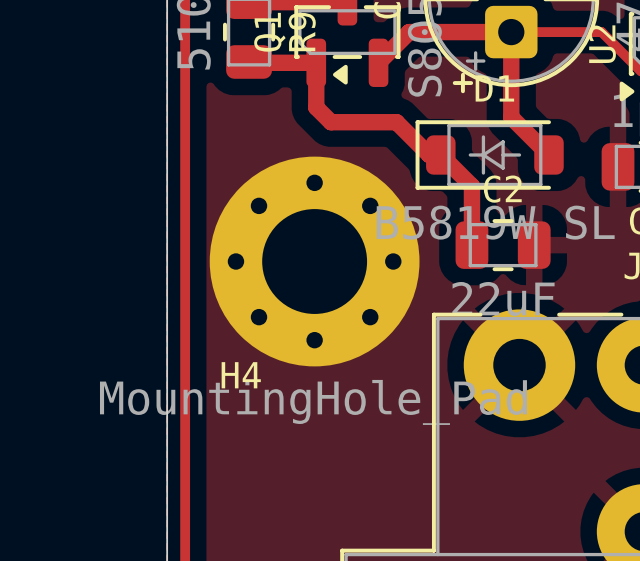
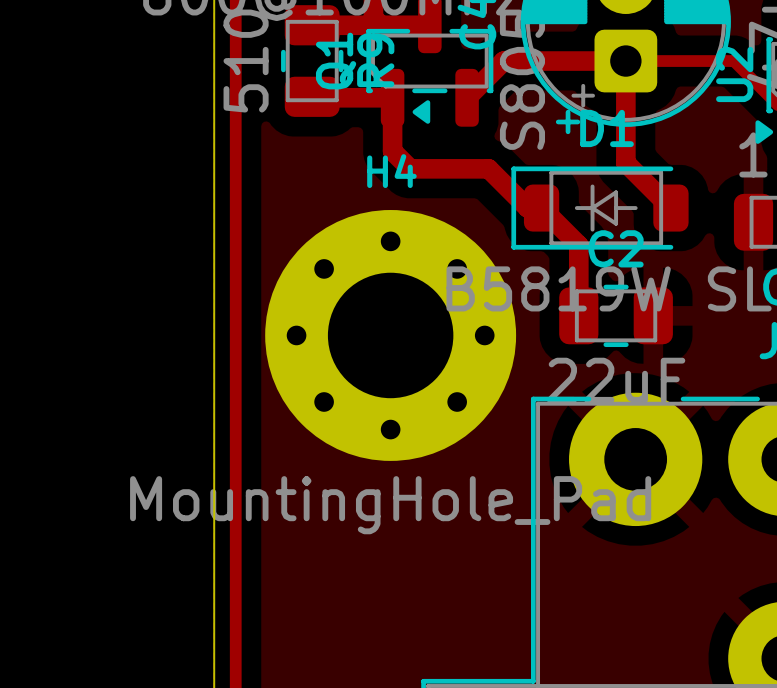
H4 name position: H4 (241, 375) -> H4 (391, 171)

